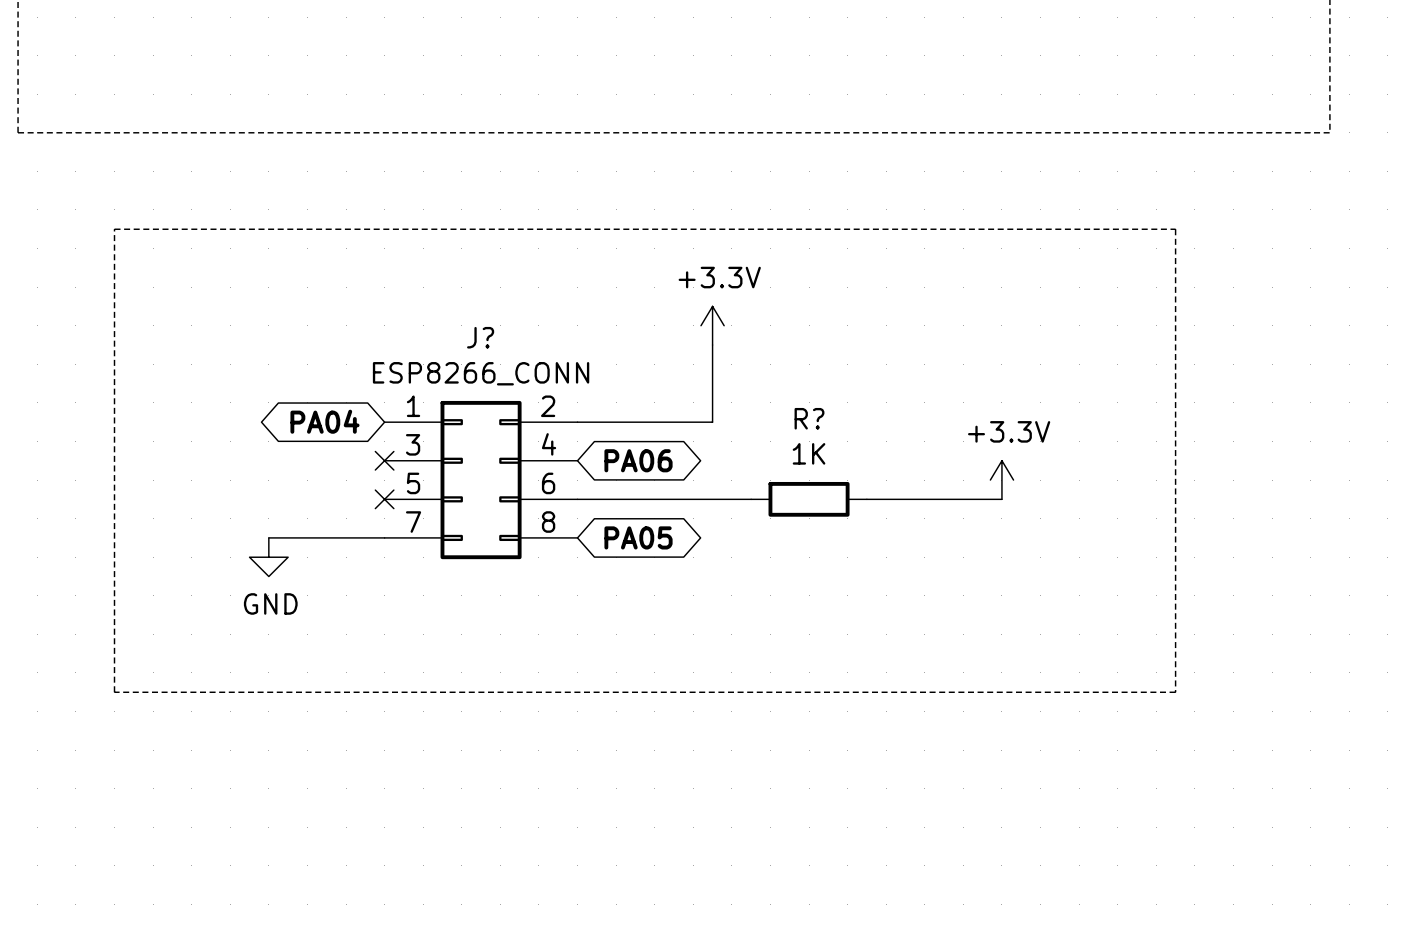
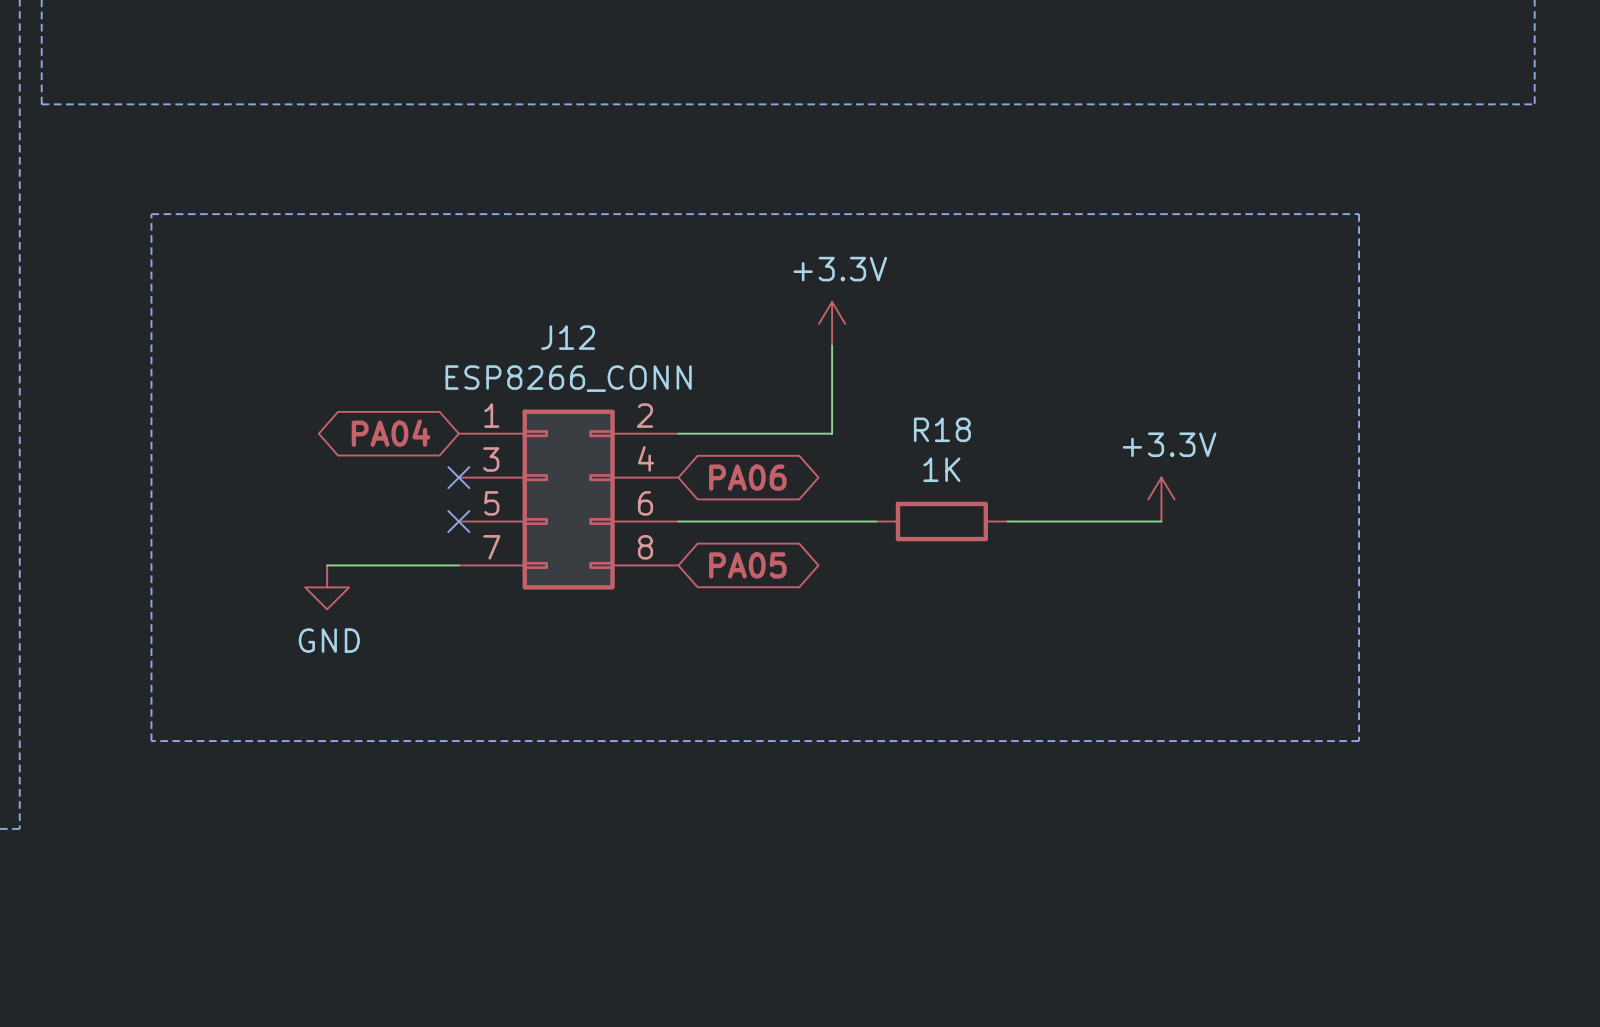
J? name: J? (480, 337) -> J12 (568, 337)
R? name: R? (809, 418) -> R18 (942, 429)

